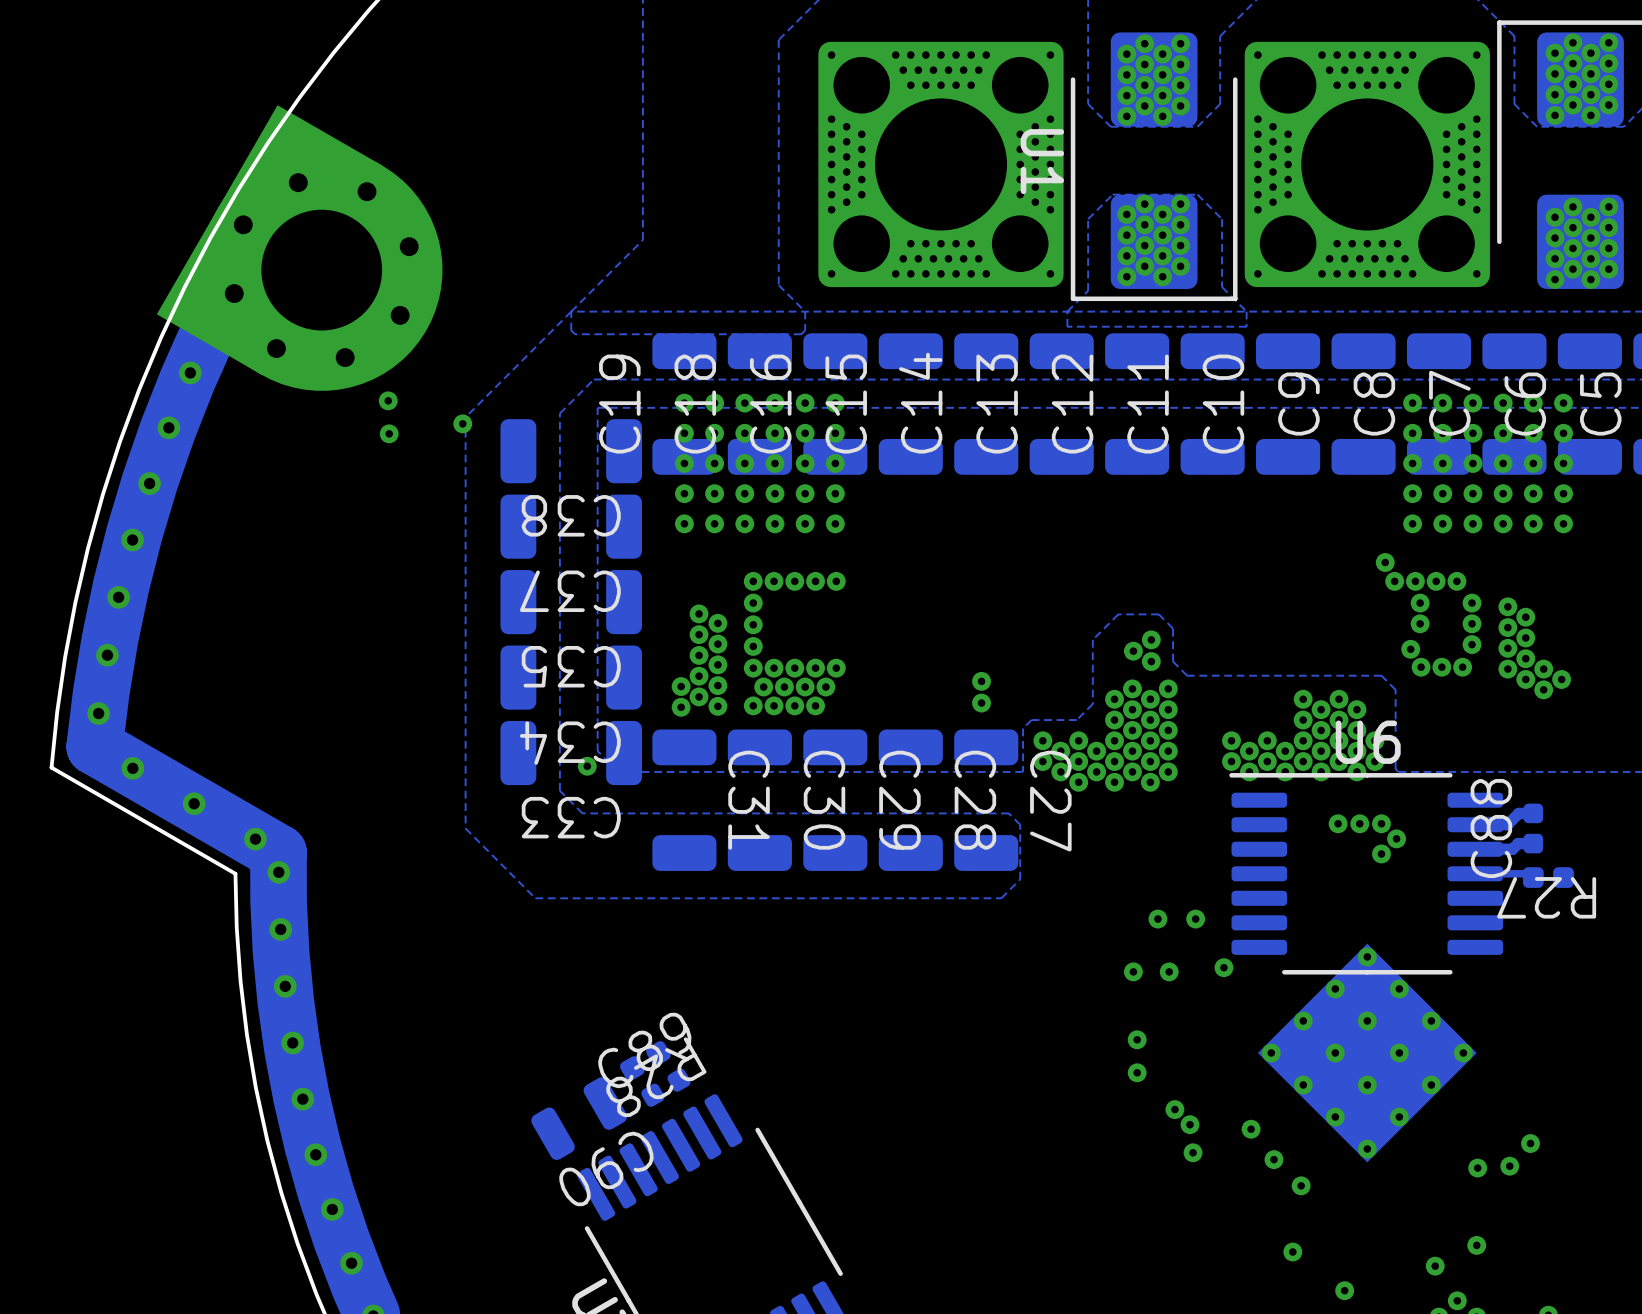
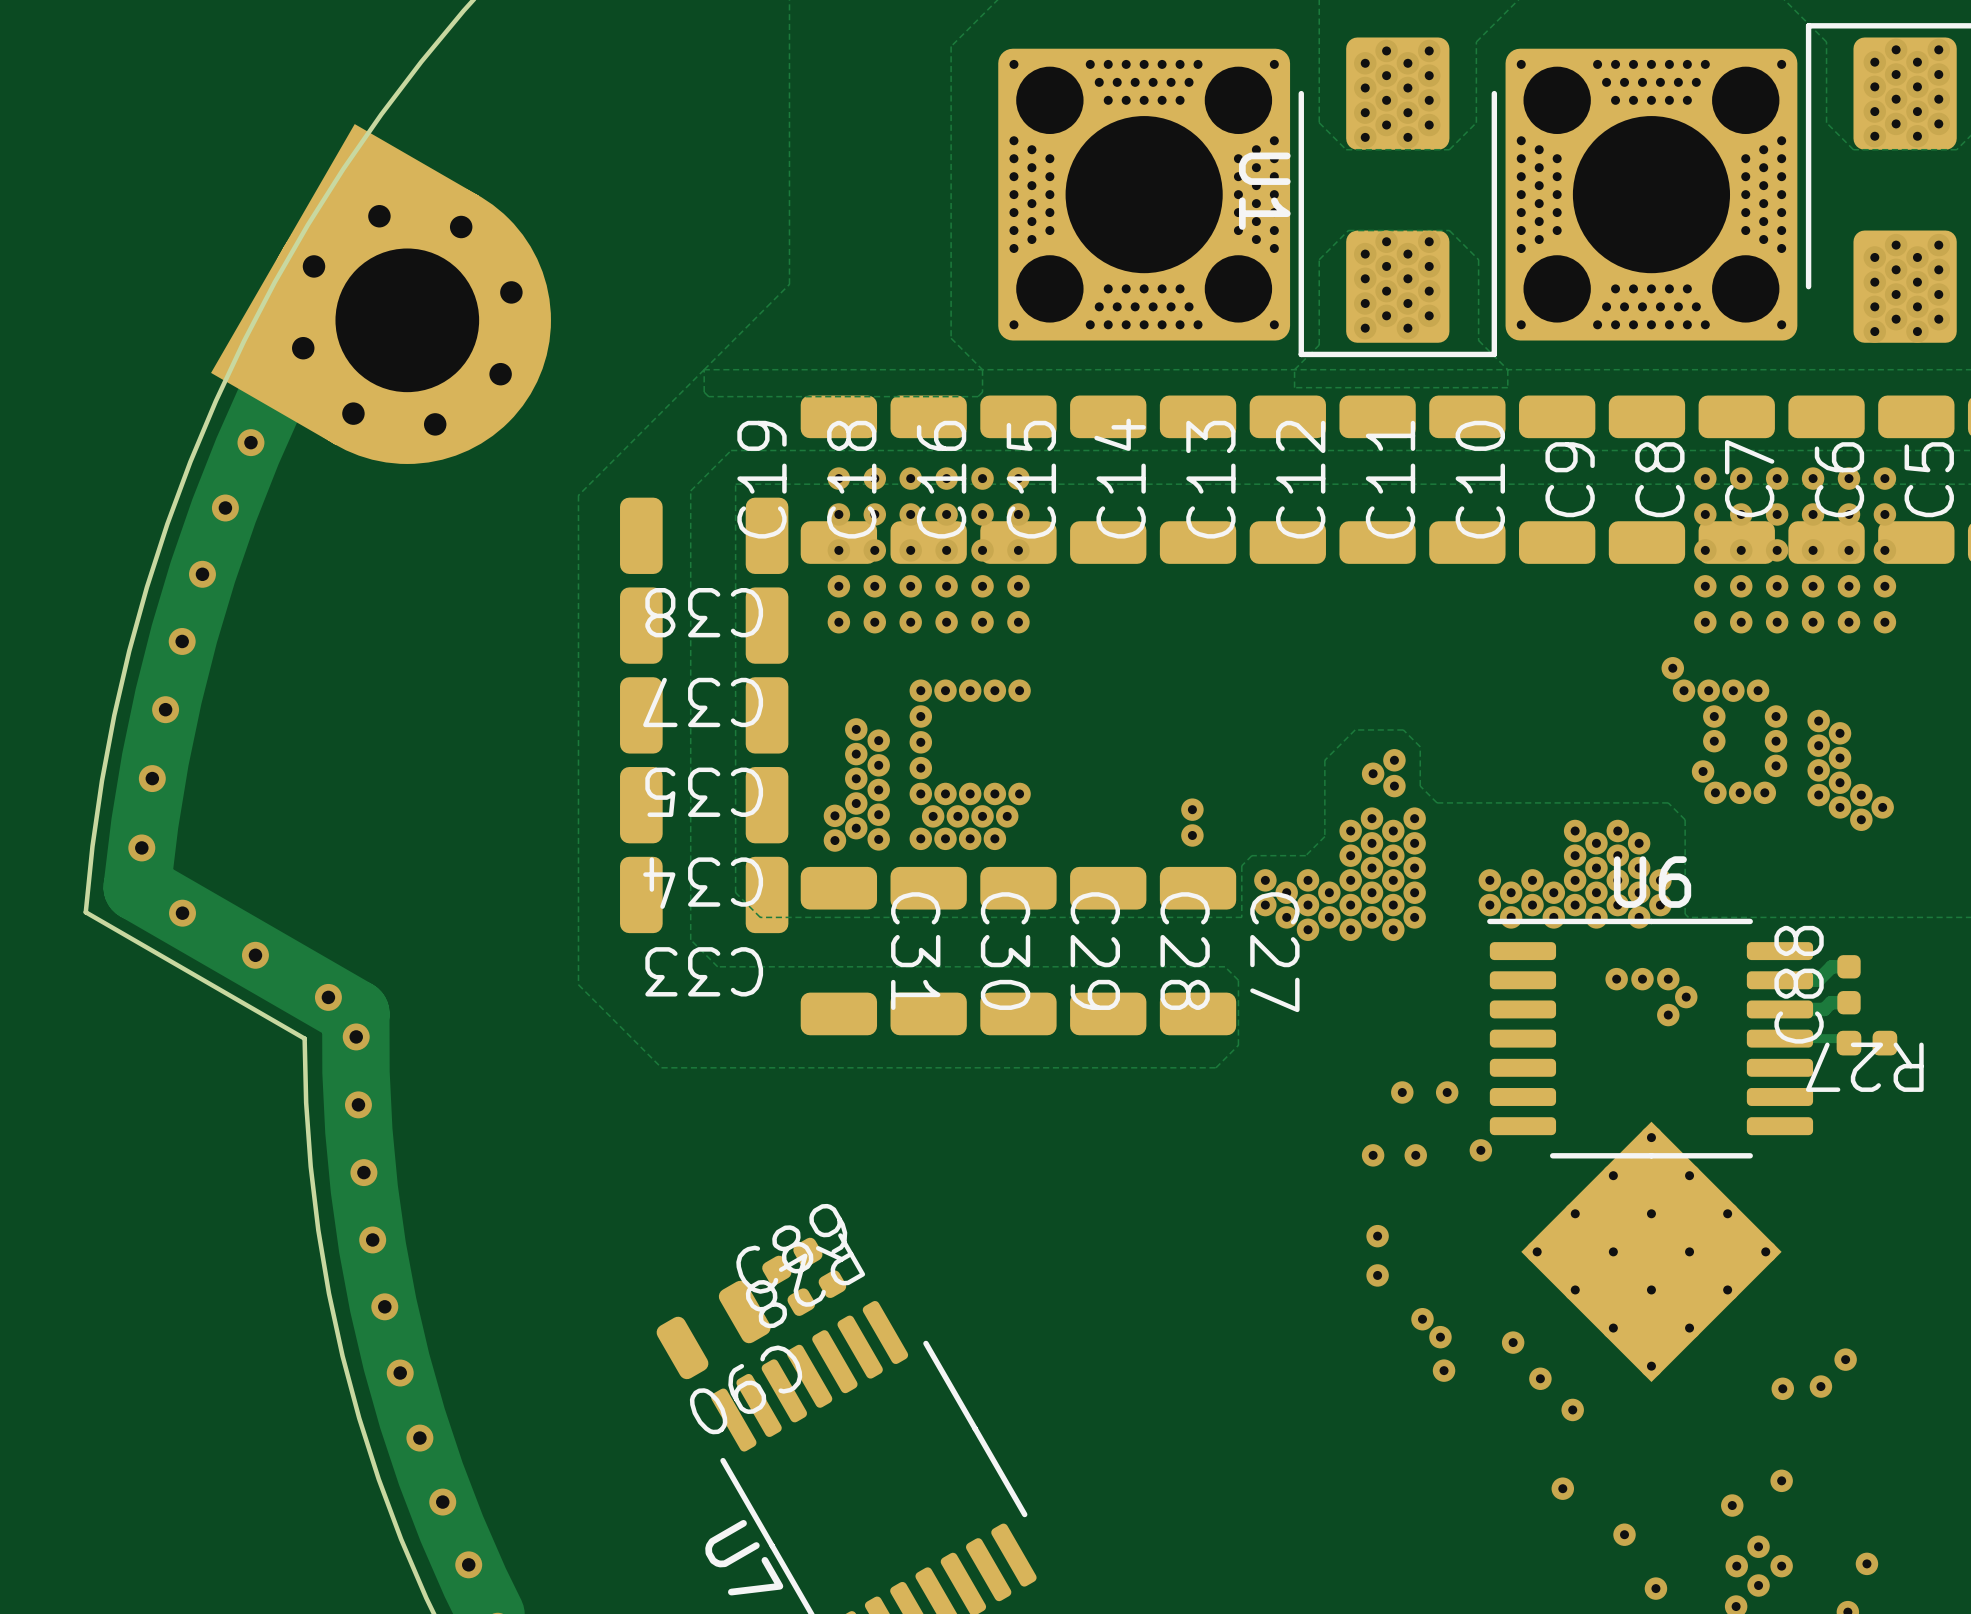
via: (388, 400) -> none
via: (462, 423) -> none
via: (389, 433) -> none
via: (587, 766) -> none

